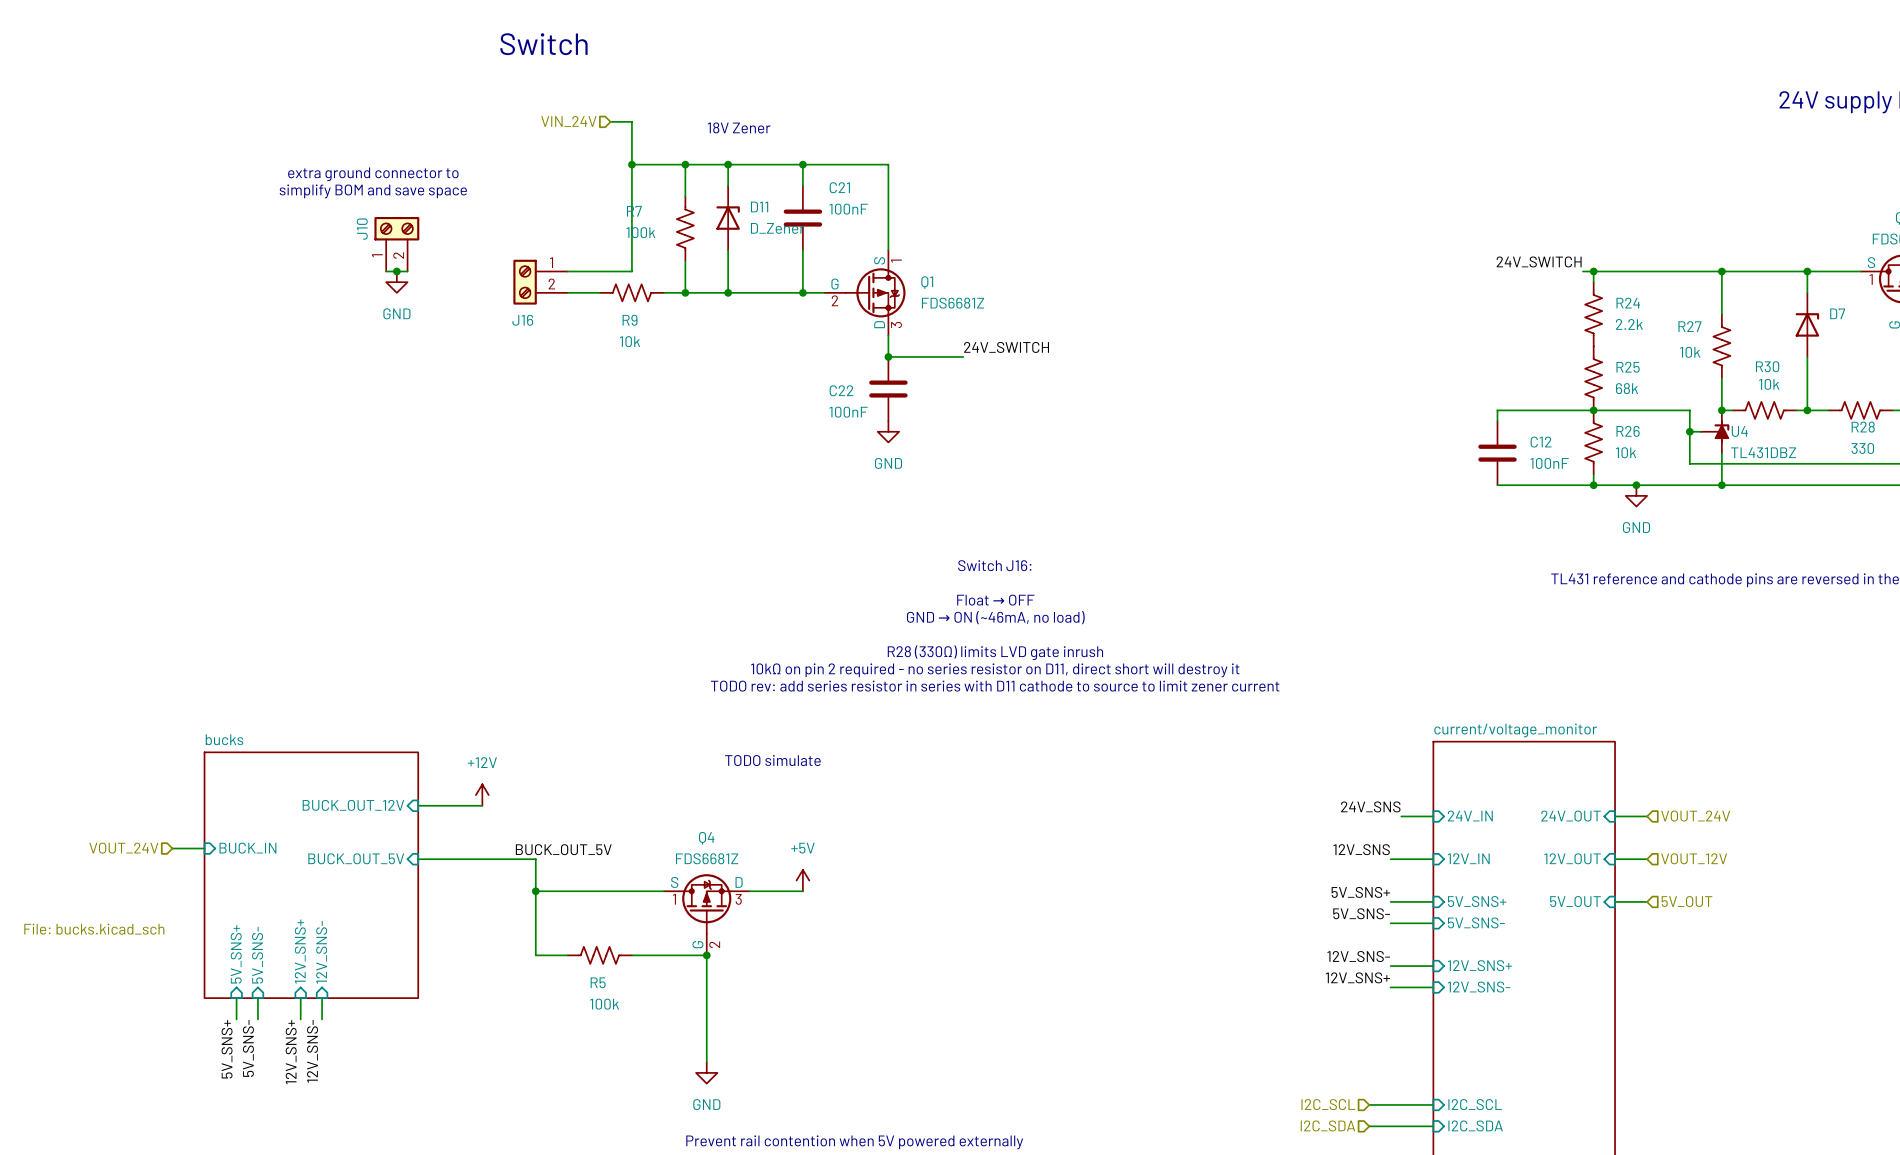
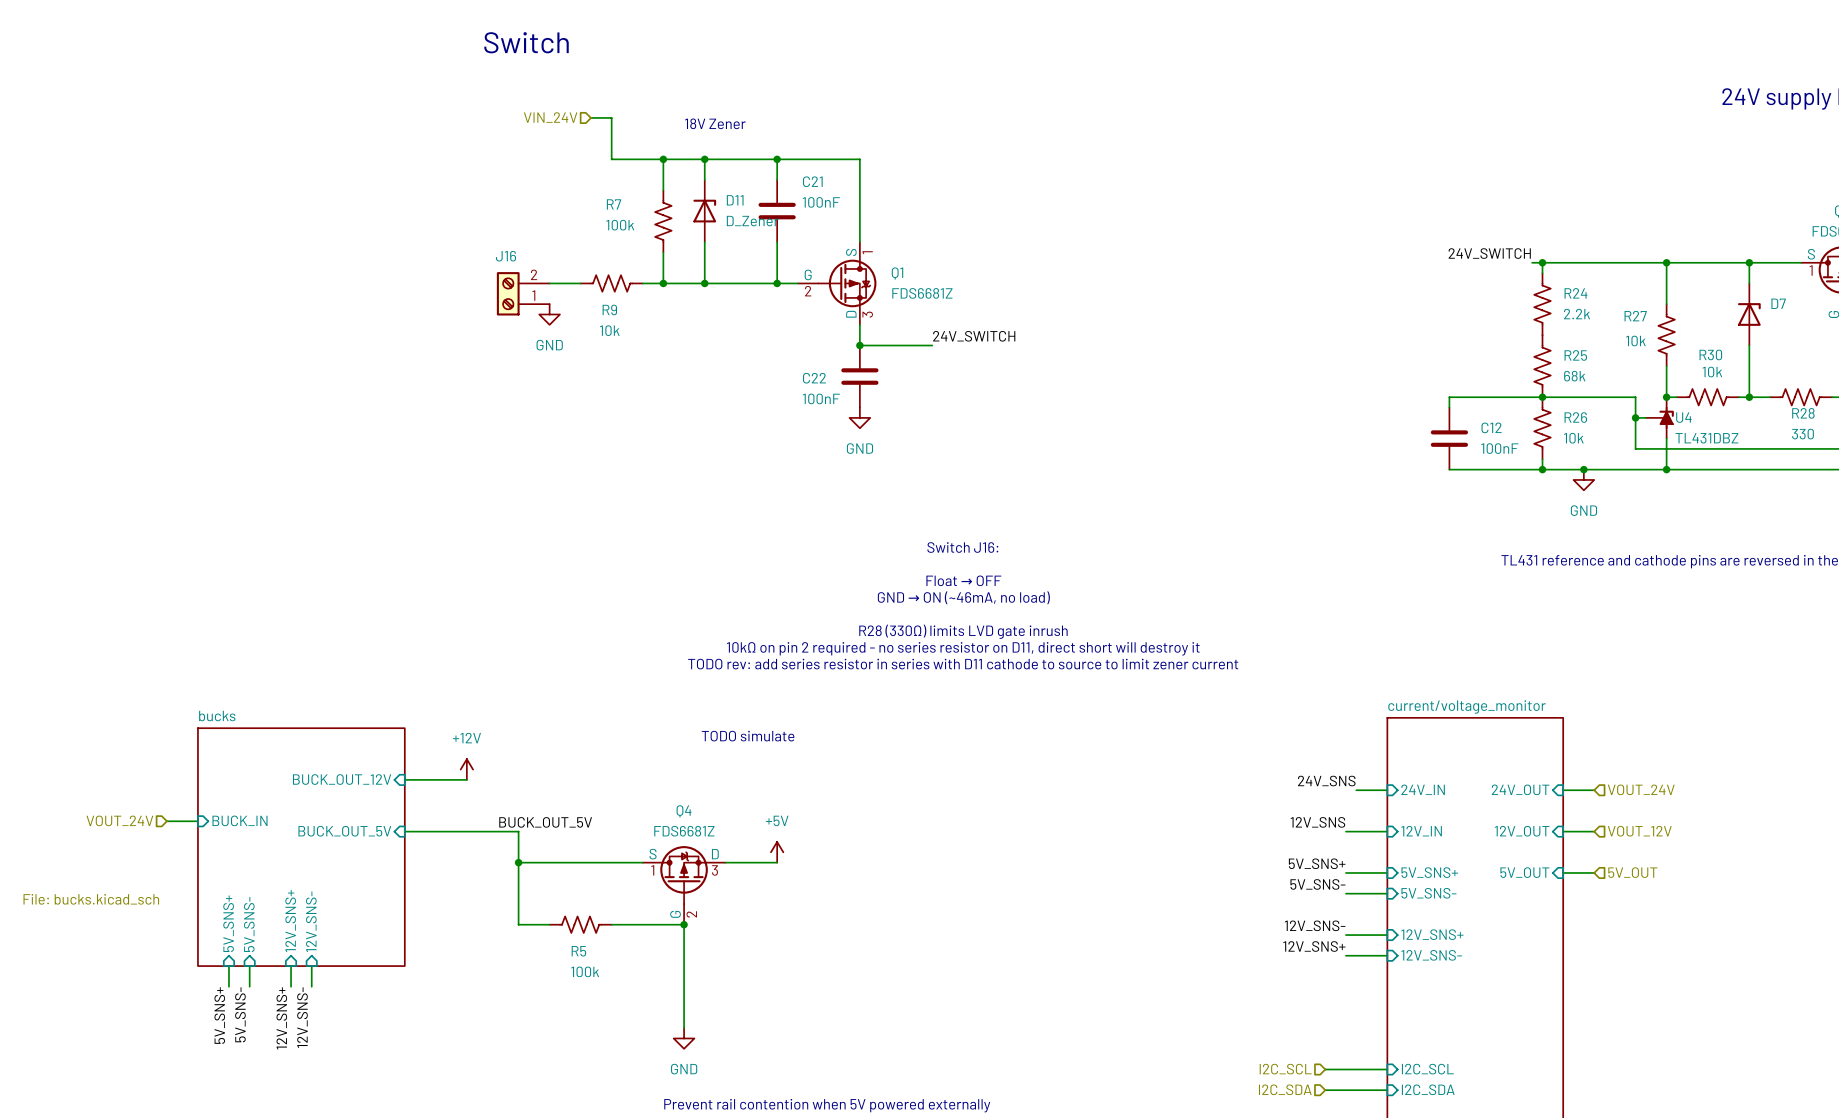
wire: (631, 164) (631, 271) (567, 271) -> none
junction: (631, 164) -> none
text: extra ground connector to (373, 174) -> none
text: simplify BOM and save space (373, 191) -> none
J10: (396, 244) -> none
wire: (386, 271) (407, 271) -> none
junction: (396, 271) -> none
power symbol position: GND (396, 282) -> GND (549, 314)
J16 flip: as is (525, 282) -> up-down (508, 293)

